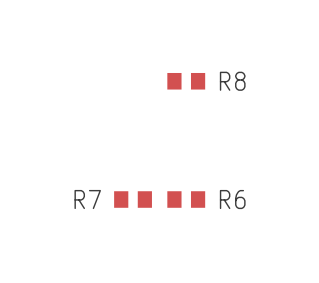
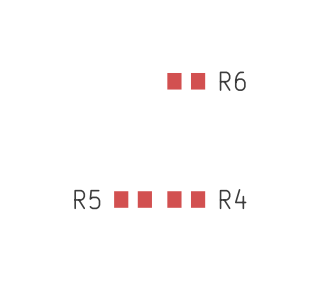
R8 name: R8 (232, 81) -> R6 (232, 81)
R7 name: R7 (87, 199) -> R5 (87, 199)
R6 name: R6 (232, 199) -> R4 (233, 199)

